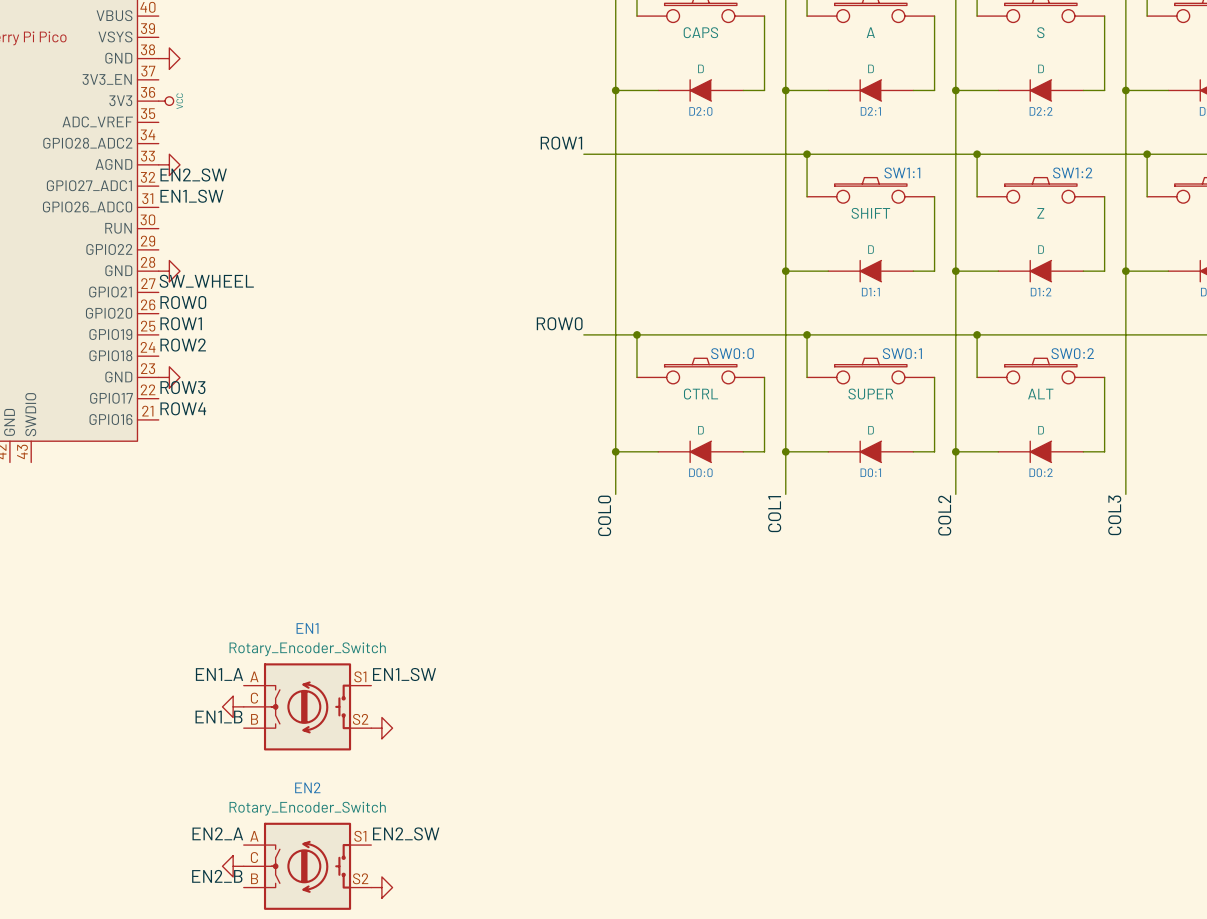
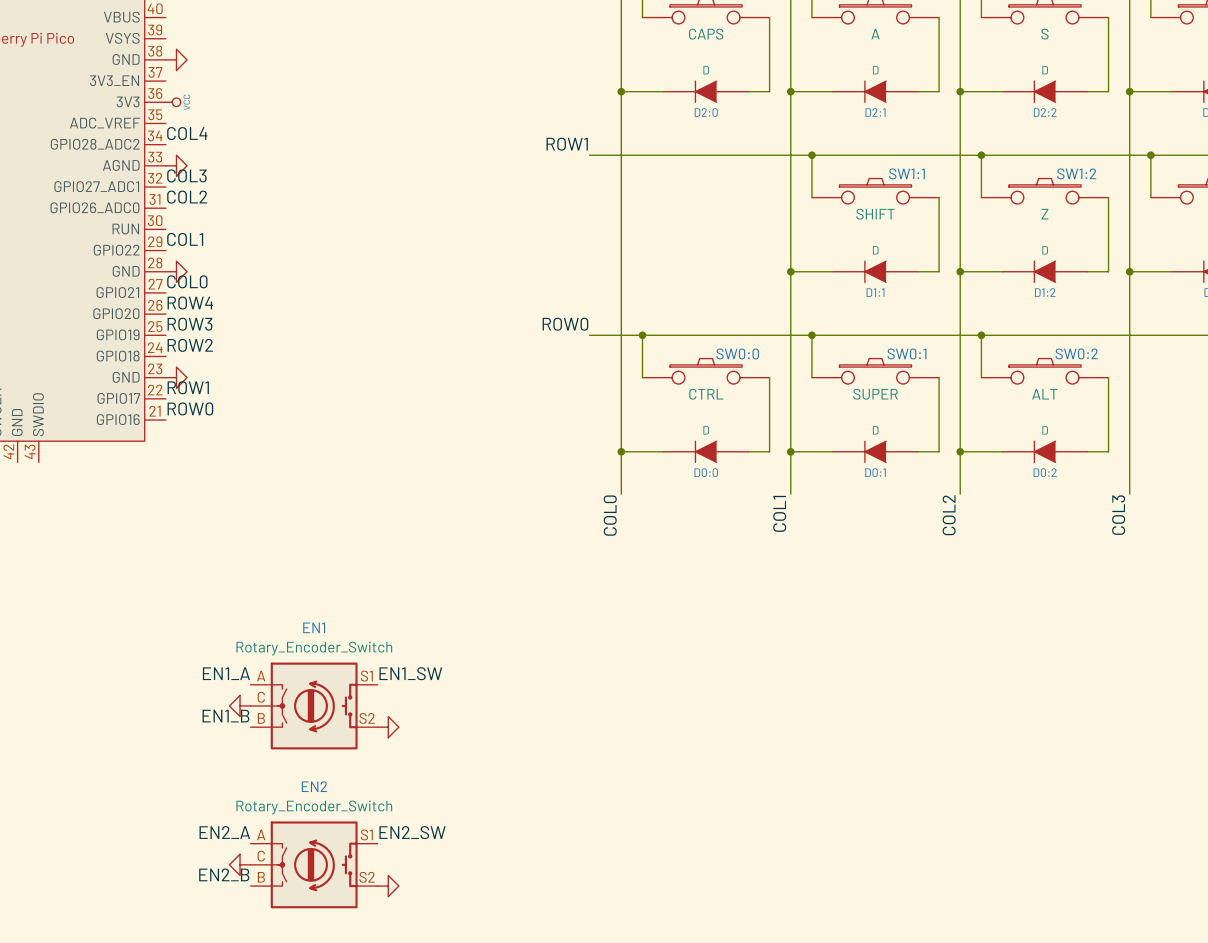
label: none -> COL4 (187, 133)
label: EN2_SW (193, 174) -> COL3 (186, 175)
label: EN1_SW (191, 196) -> COL2 (187, 197)
label: none -> COL1 (185, 239)
label: SW_WHEEL (206, 281) -> COL0 (187, 281)
label: ROW0 (183, 302) -> ROW4 (190, 303)
label: ROW1 (181, 323) -> ROW3 (190, 324)
label: ROW3 (182, 387) -> ROW1 (188, 387)
label: ROW4 (183, 408) -> ROW0 (190, 408)

